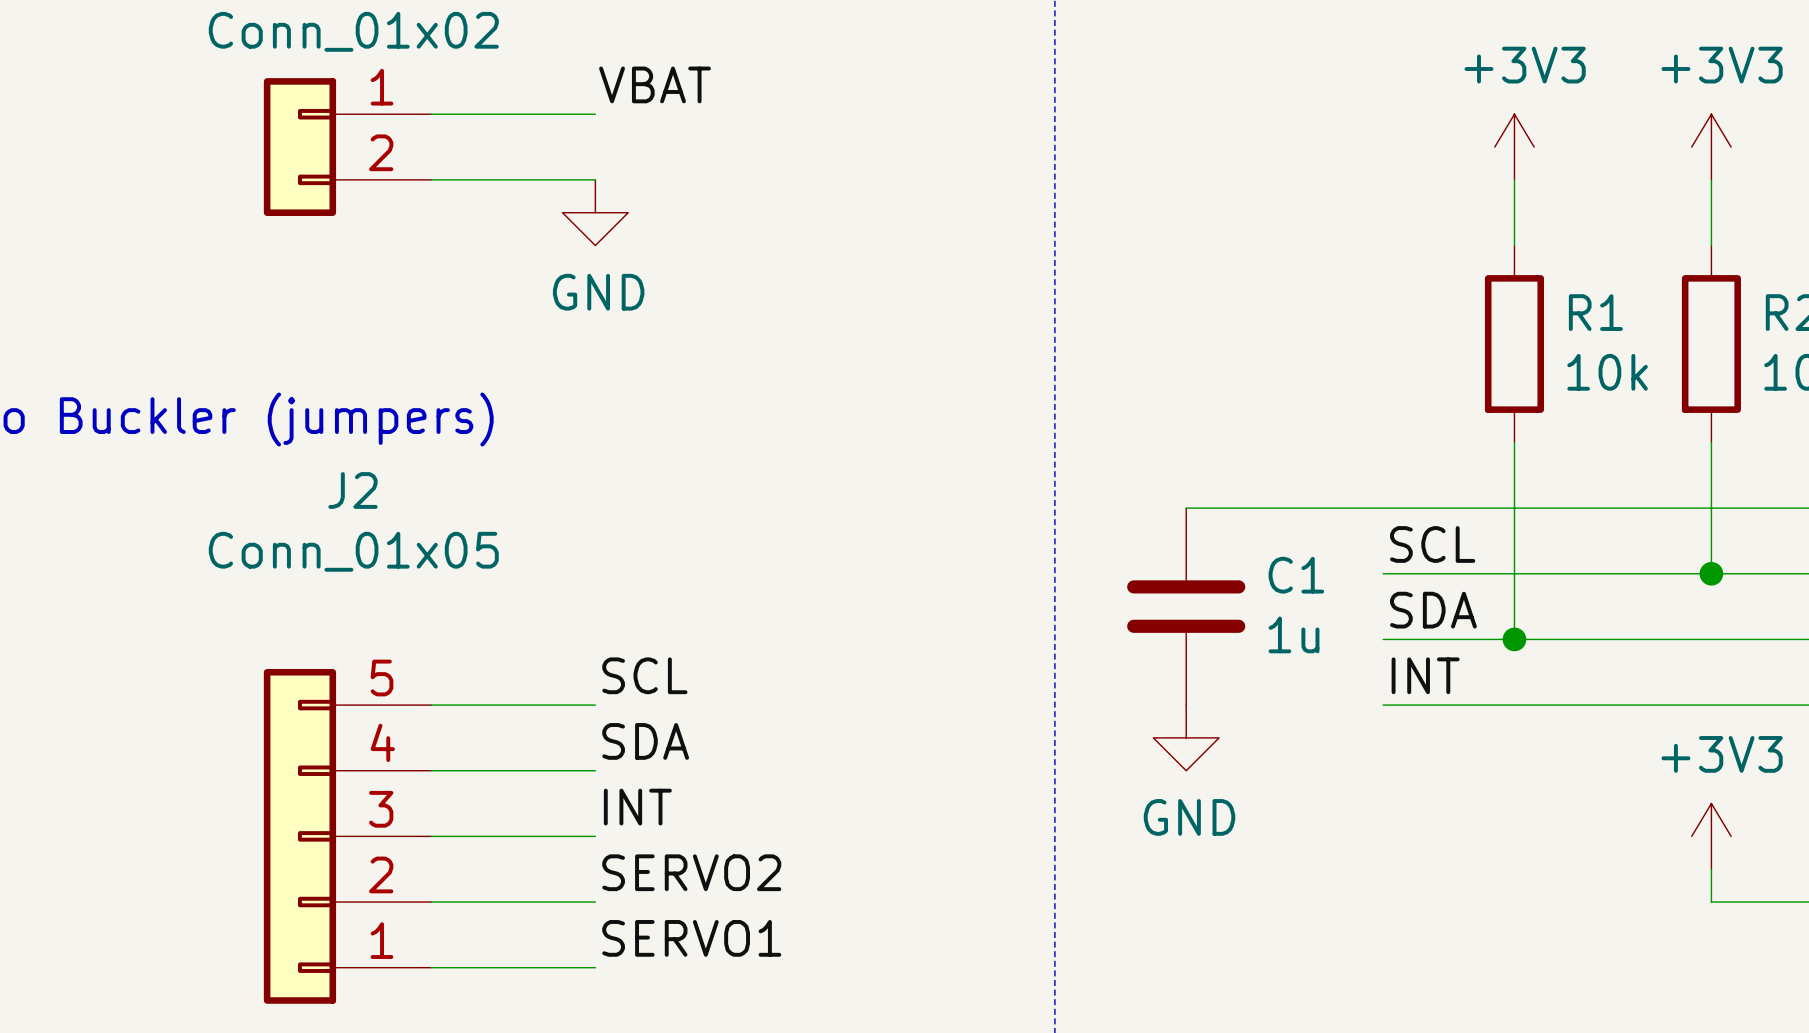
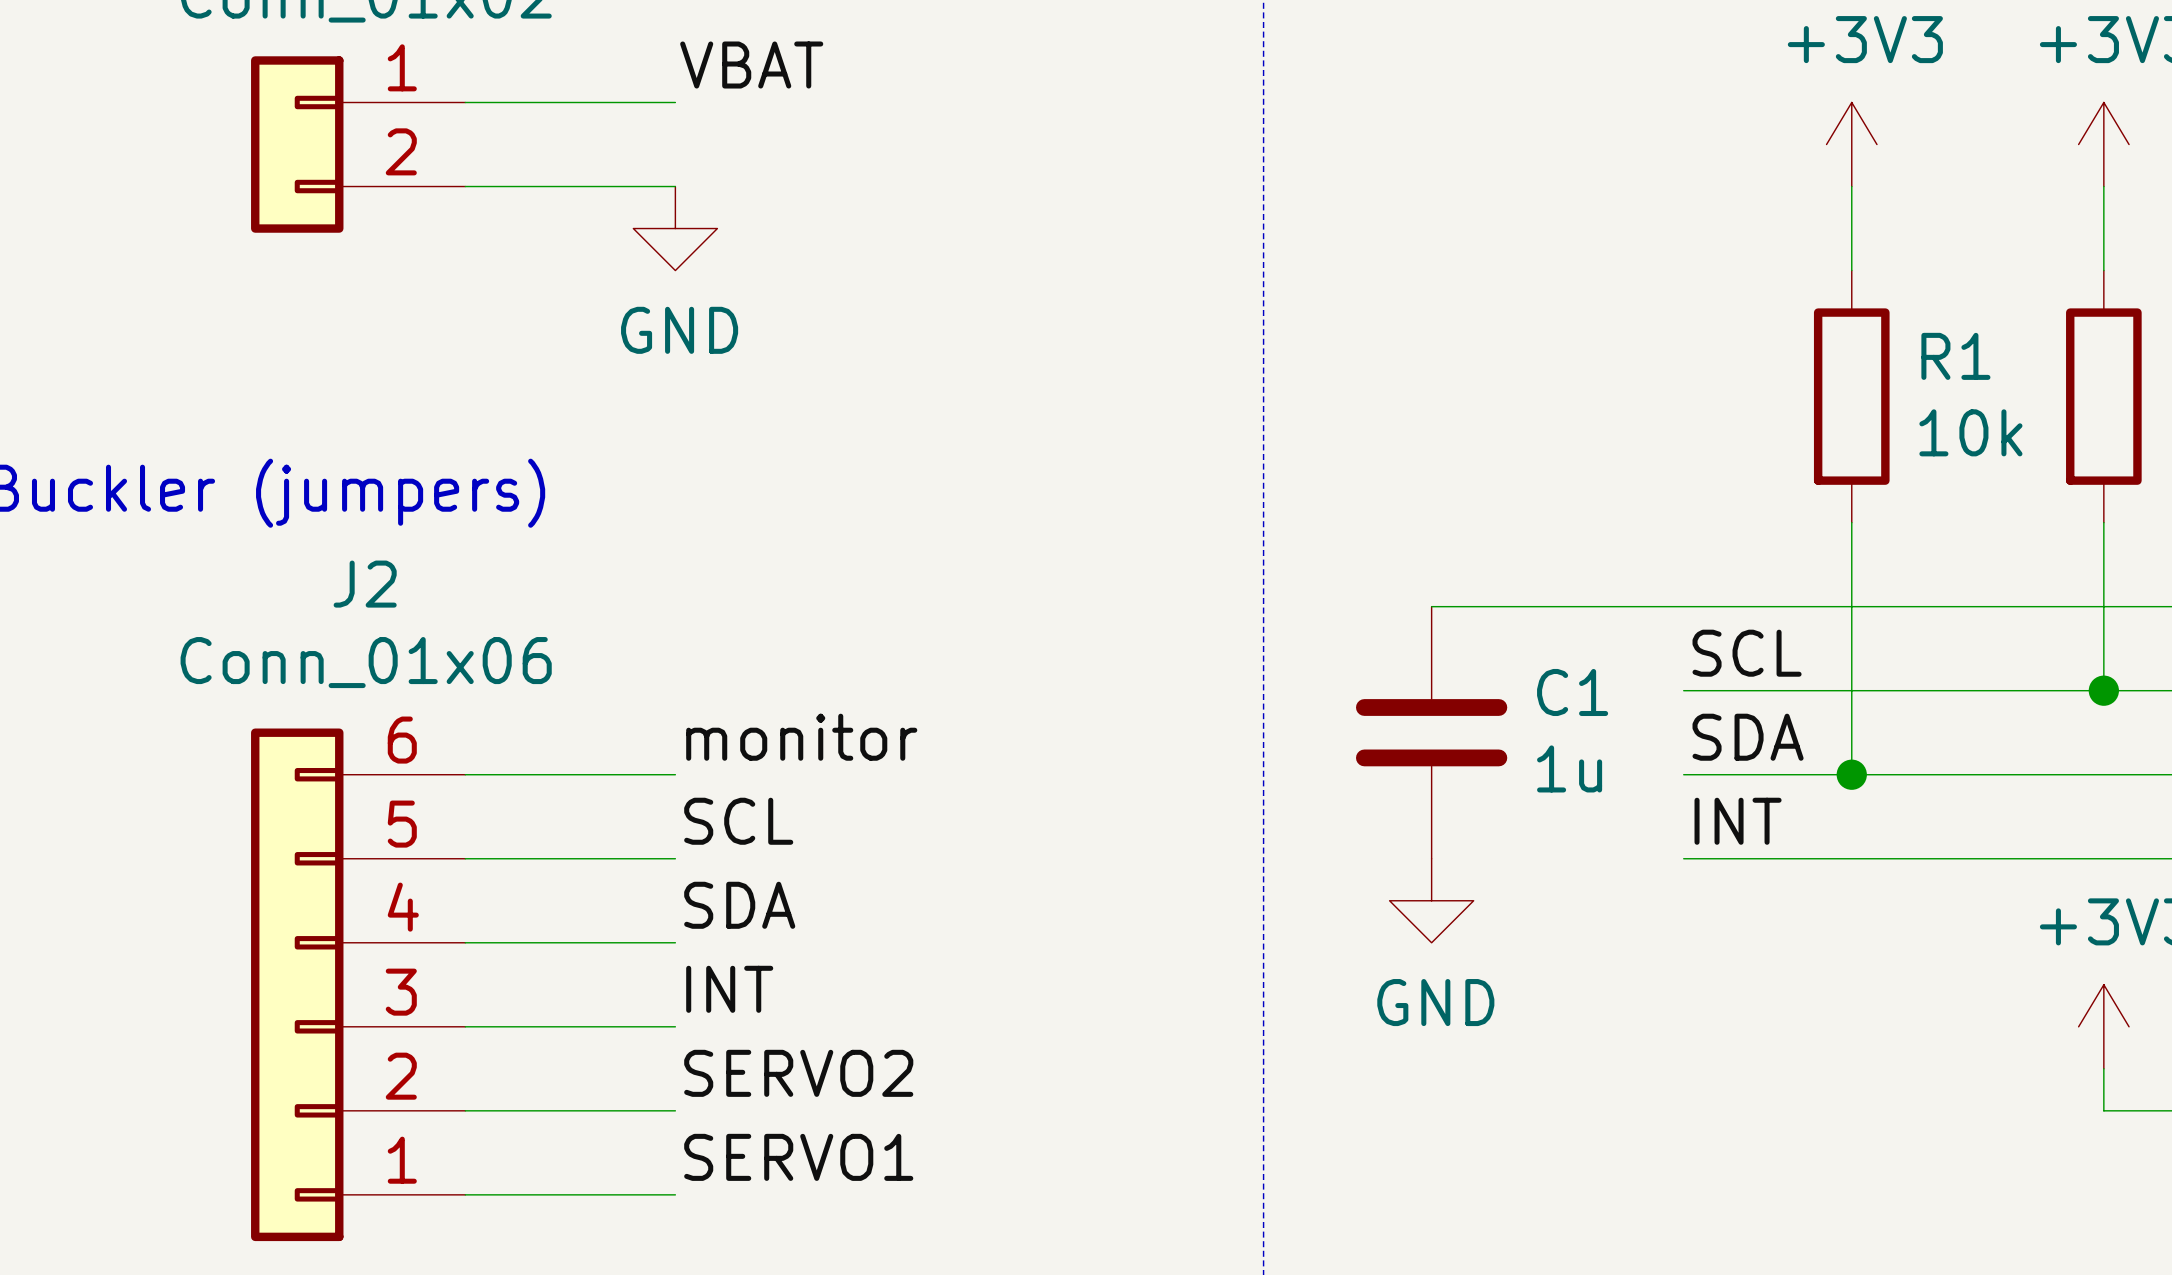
J2 value: Conn_01x05 (353, 551) -> Conn_01x06 (366, 662)
label: none -> monitor (801, 737)
wire: none -> (465, 774) (675, 774)
J2 symbol: [263, 668, 432, 1004] -> [251, 728, 466, 1242]

